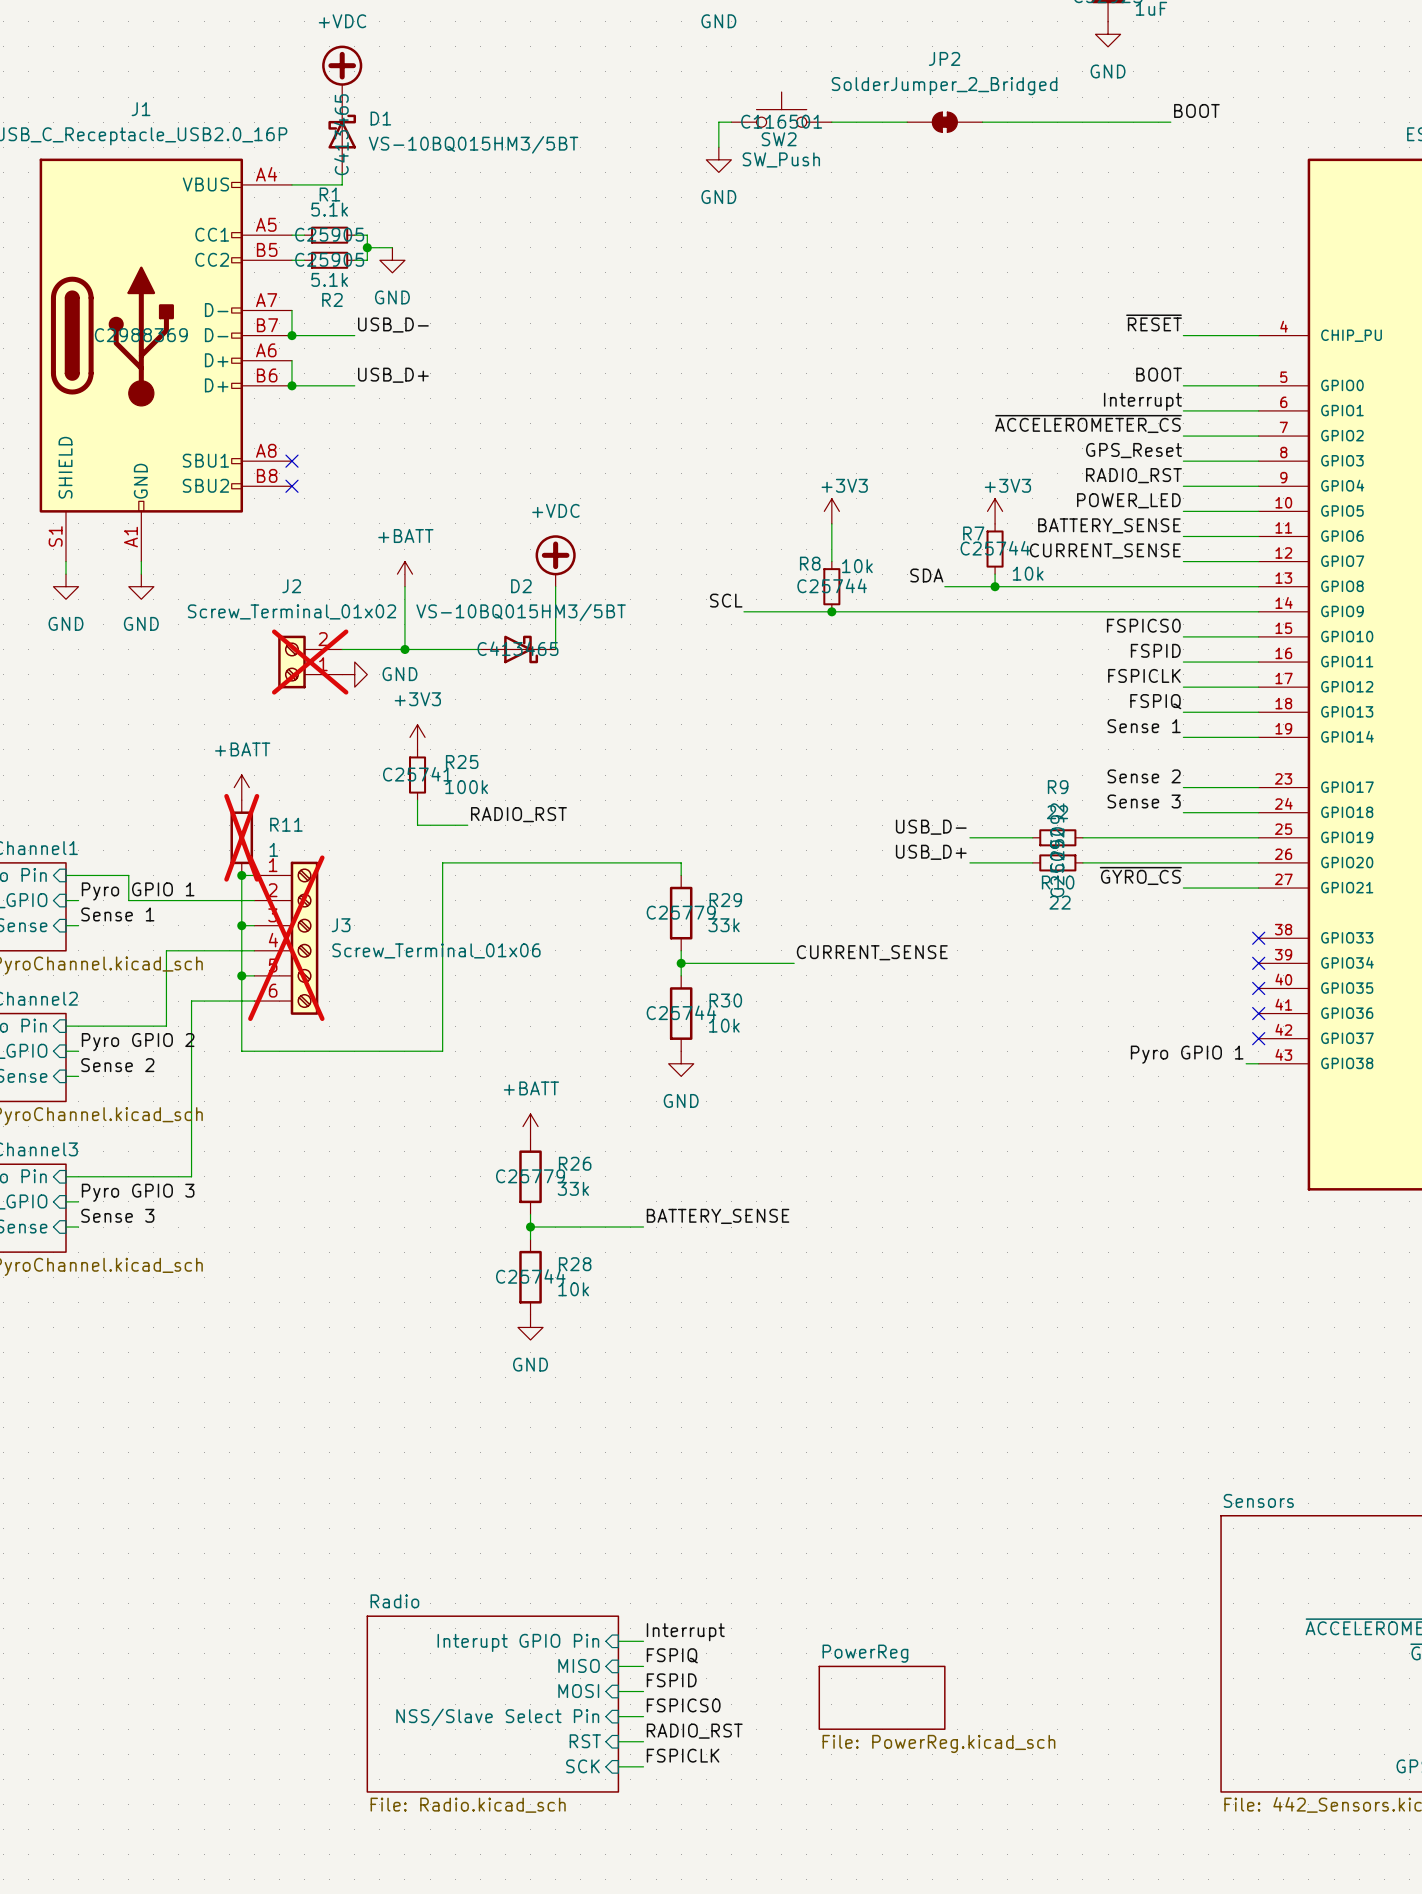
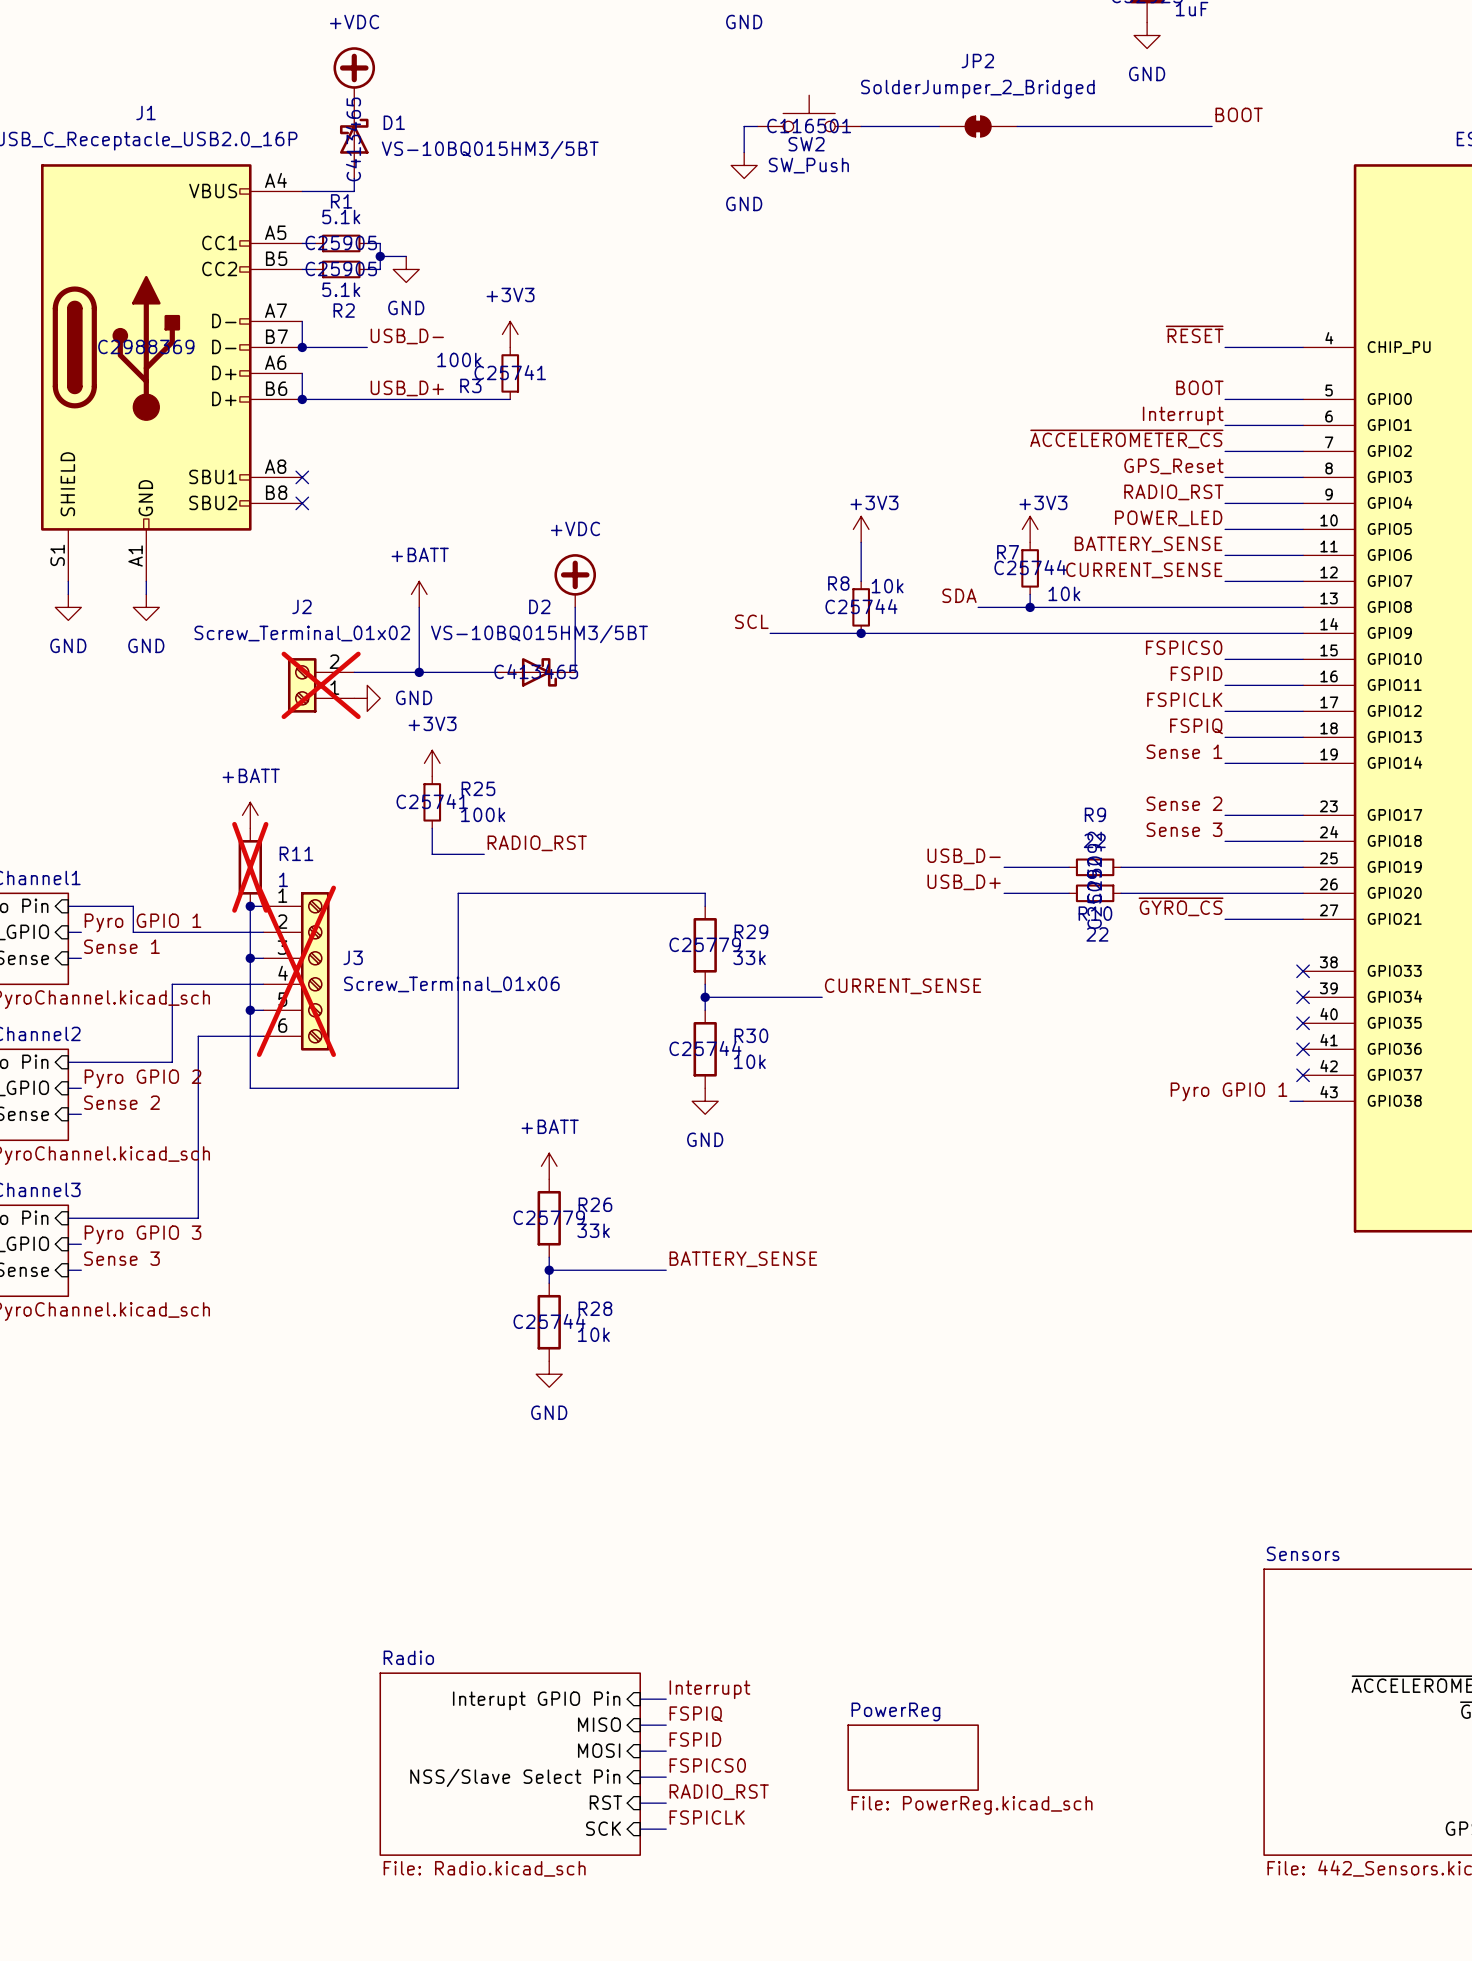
power symbol: none -> +3V3 (510, 334)
R3: none -> 100k (510, 373)
wire: none -> (367, 399) (510, 399)

